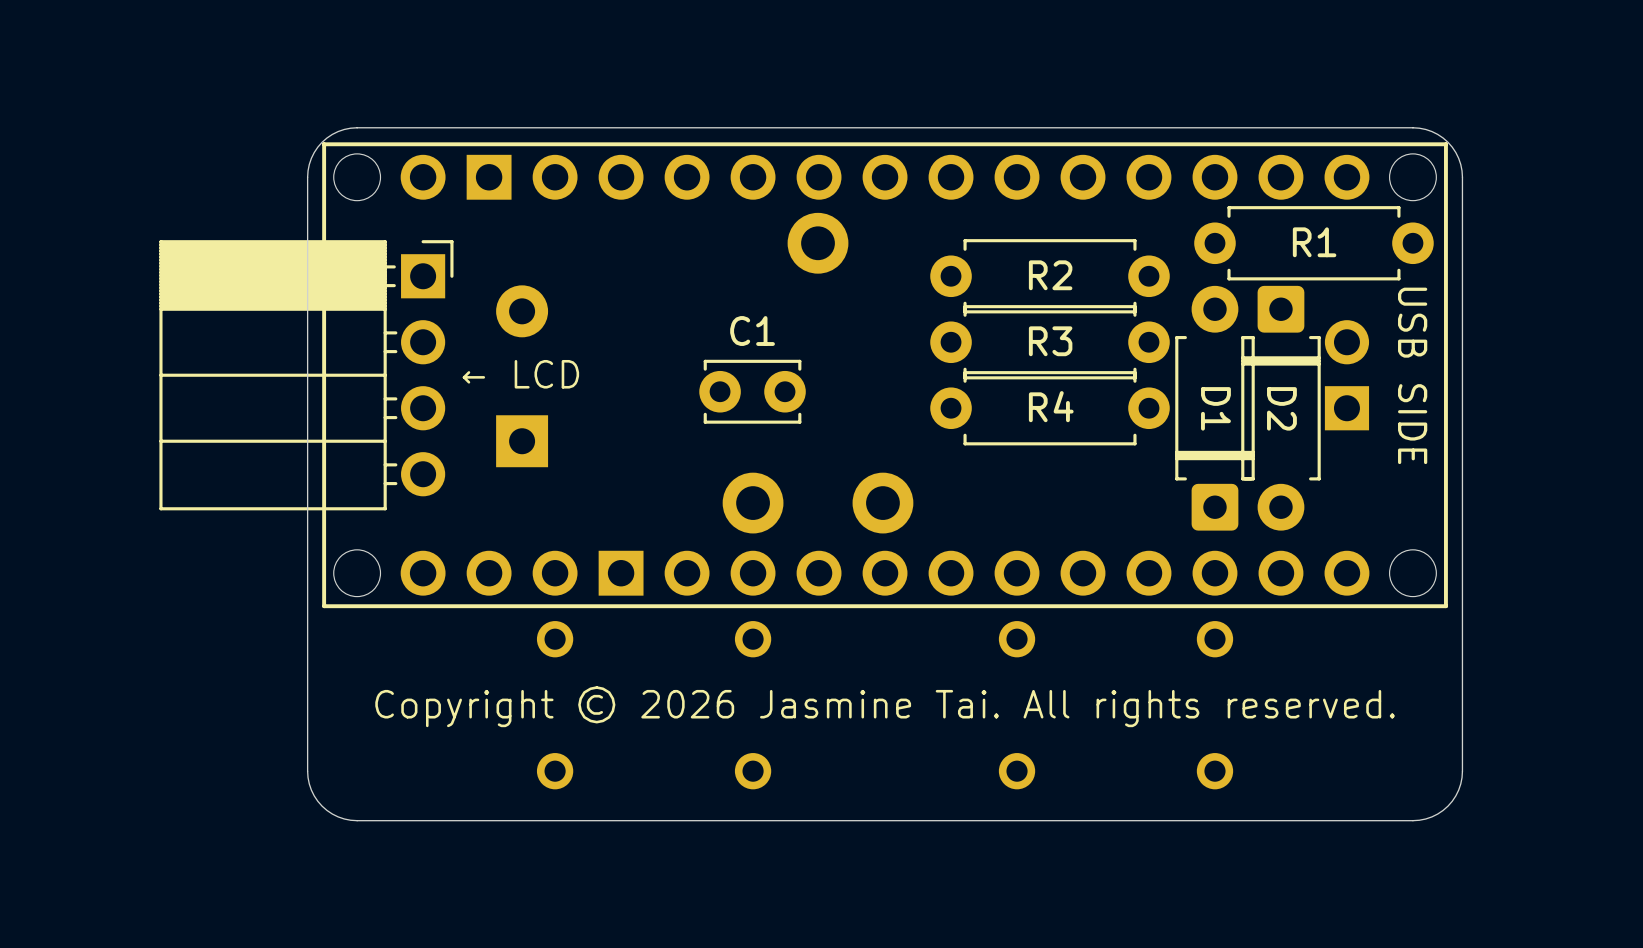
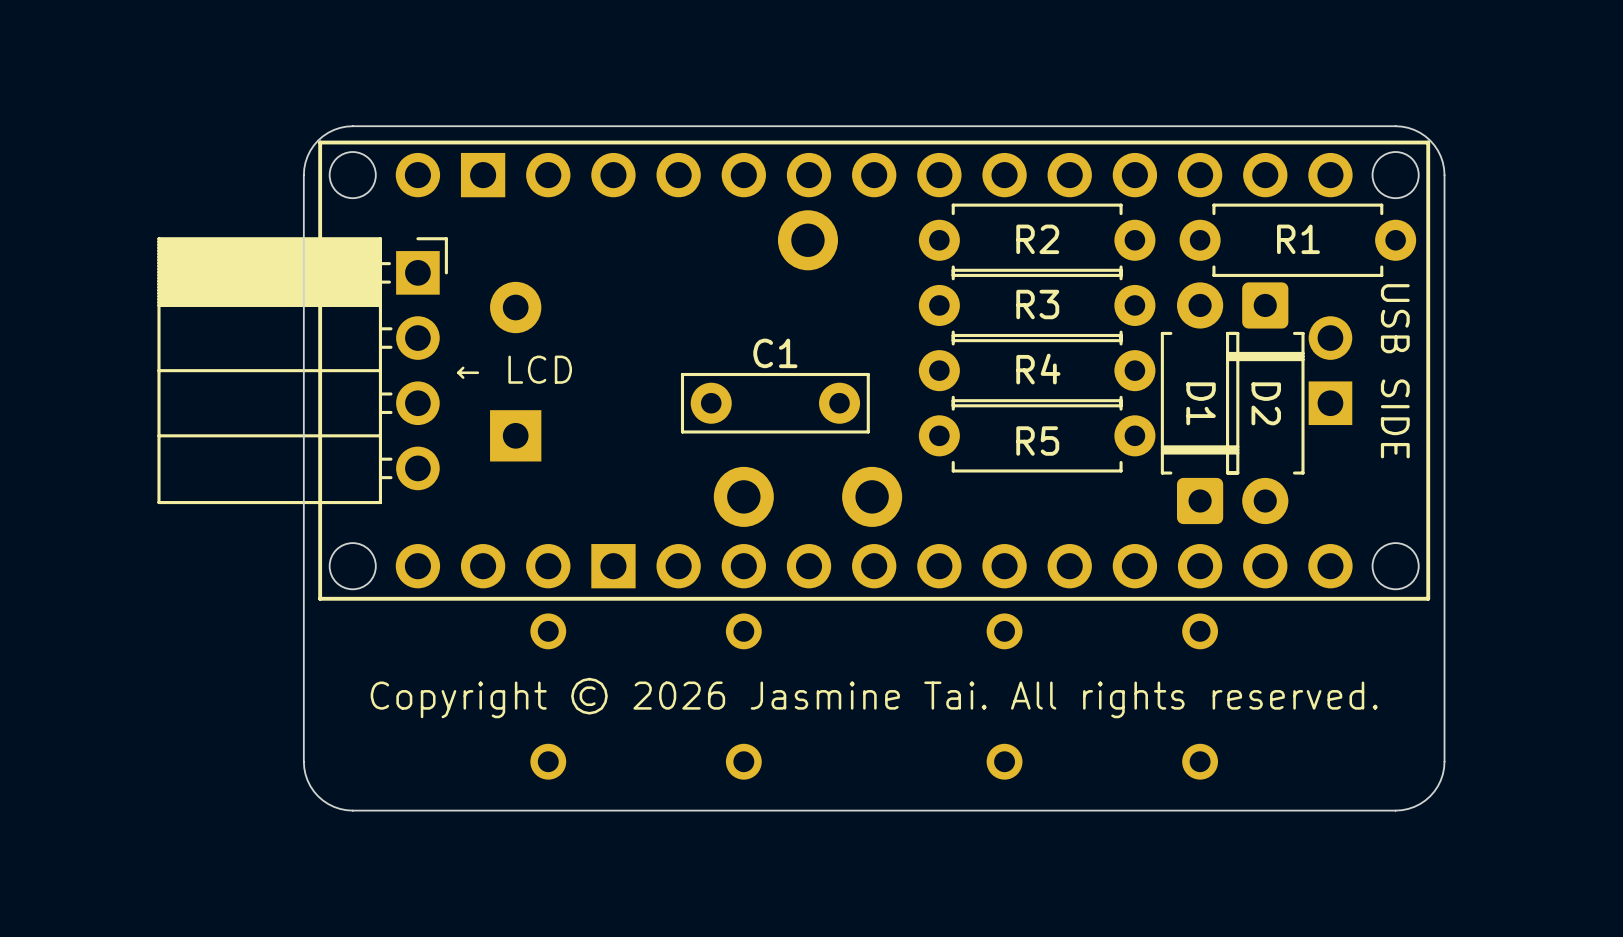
R2 position: (1050, 276) -> (1037, 240)
R3 position: (1050, 342) -> (1037, 305)
C1 footprint: [699, 359, 806, 424] -> [680, 372, 870, 434]
R4 position: (1050, 408) -> (1037, 370)
R5: none -> (1037, 435)

